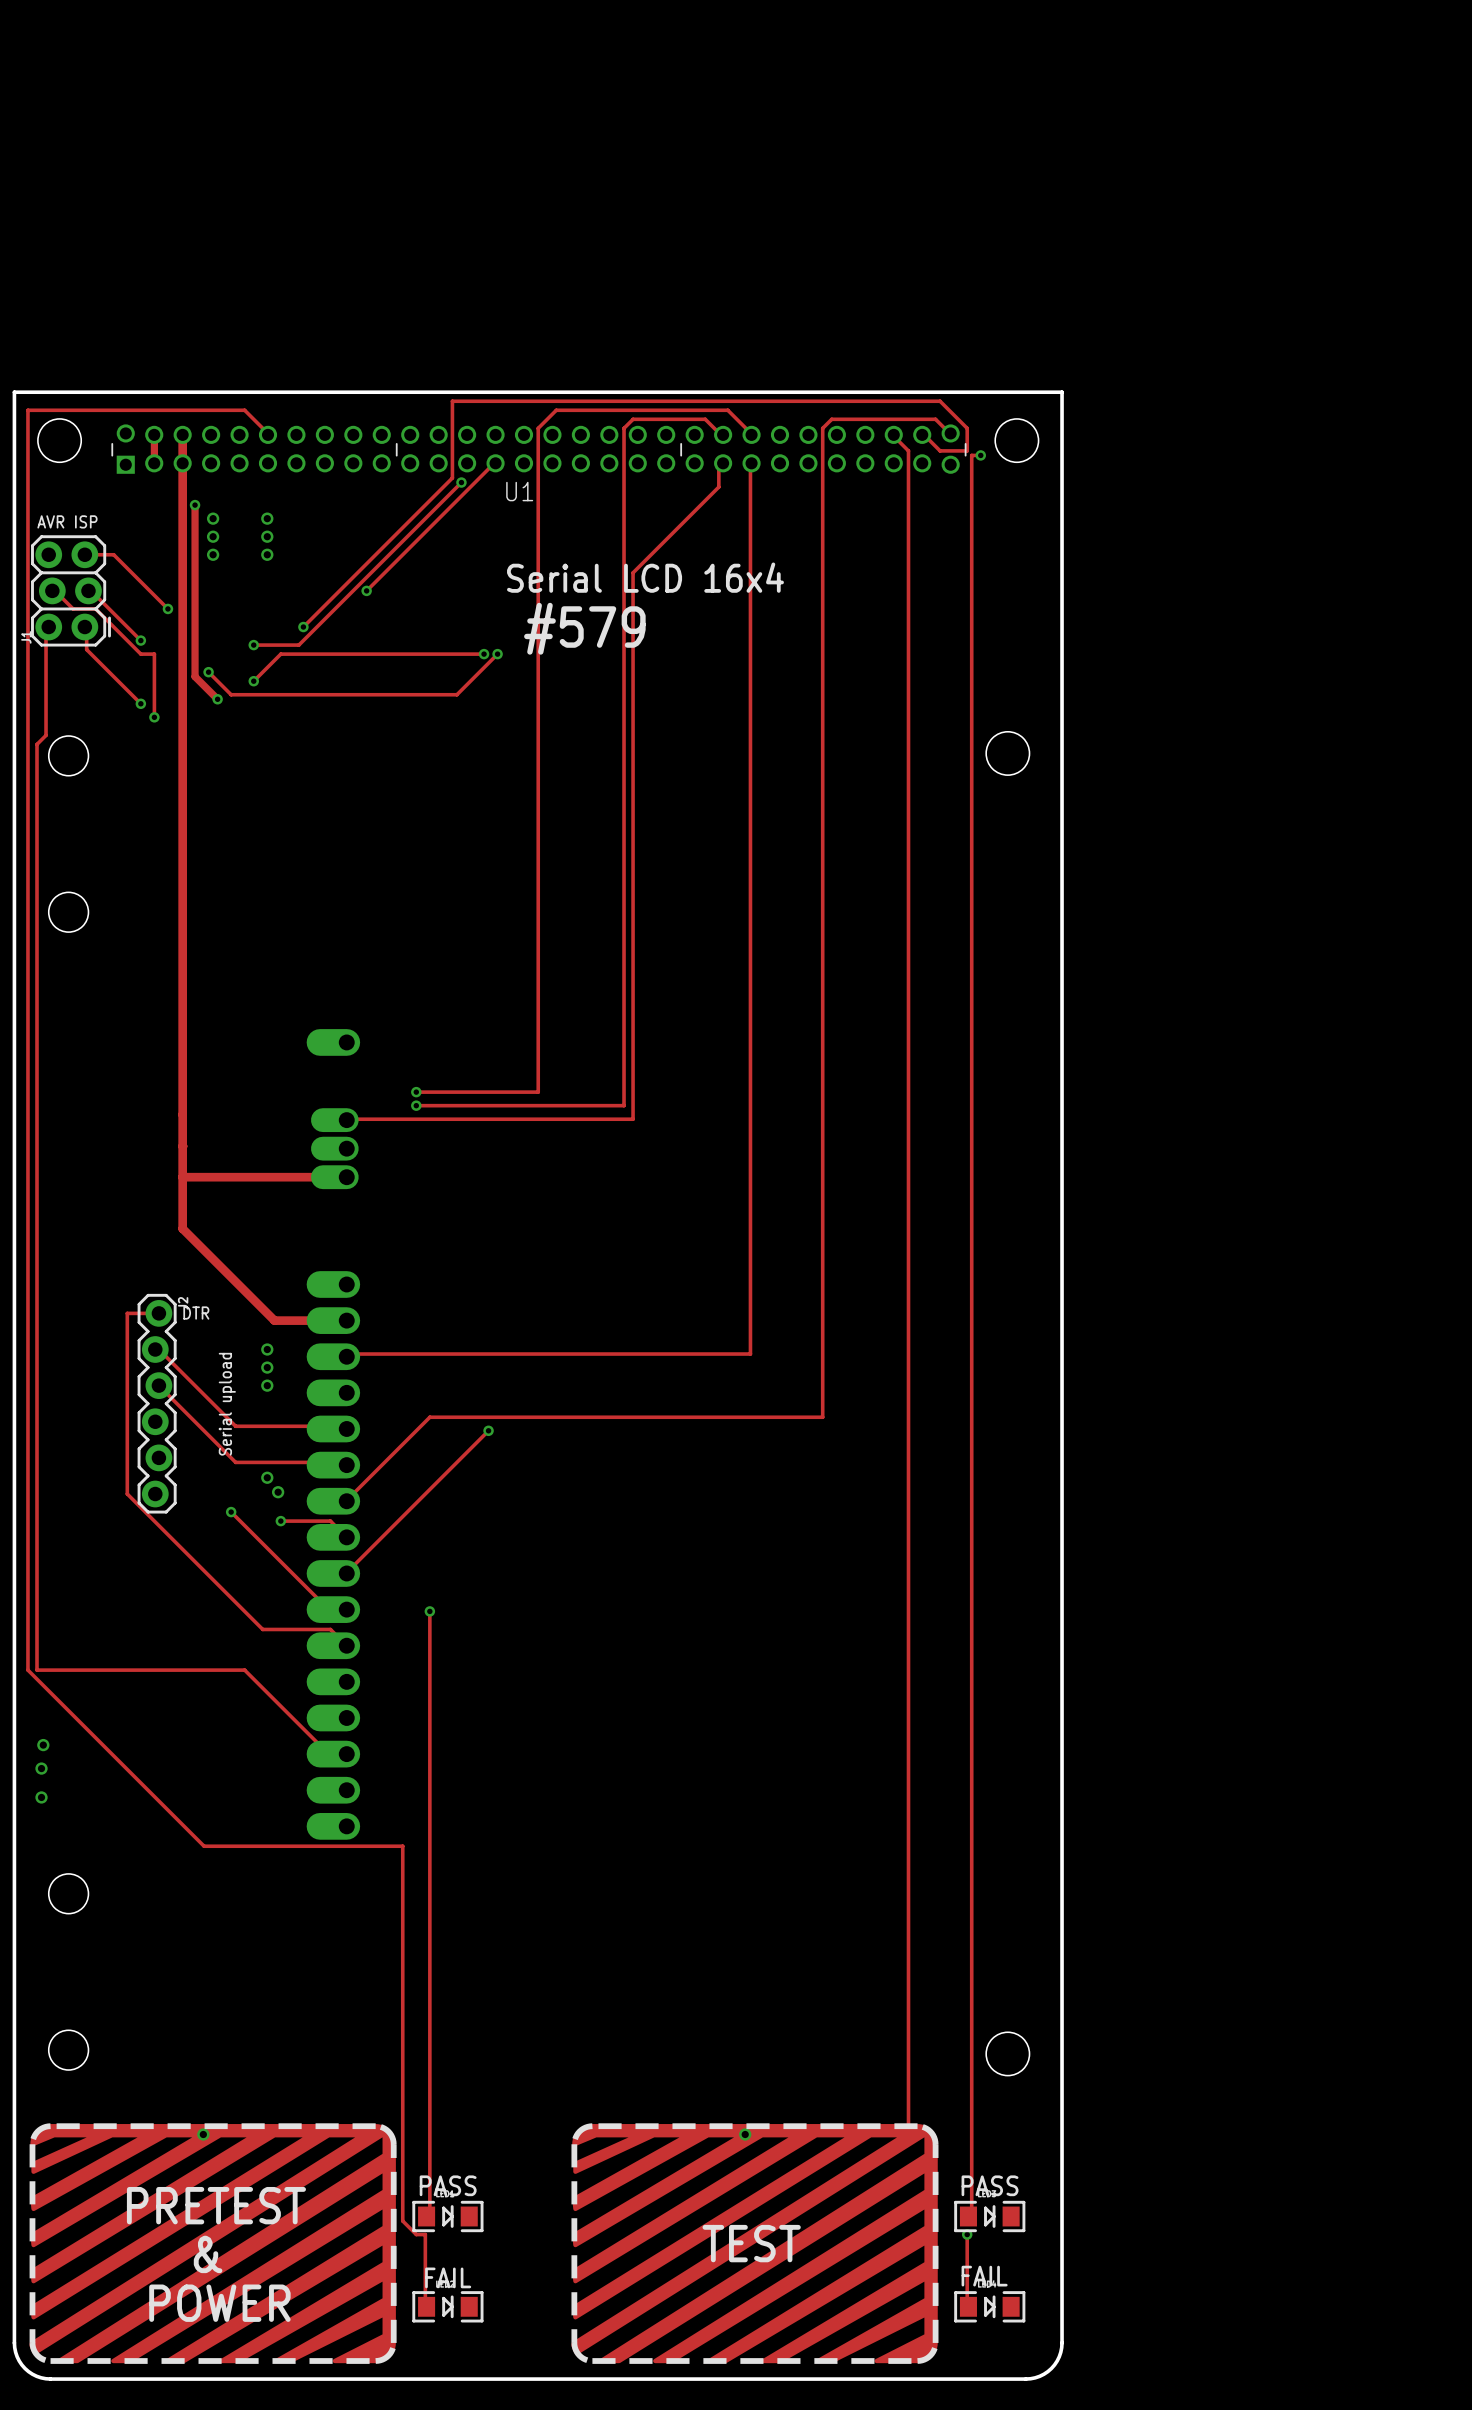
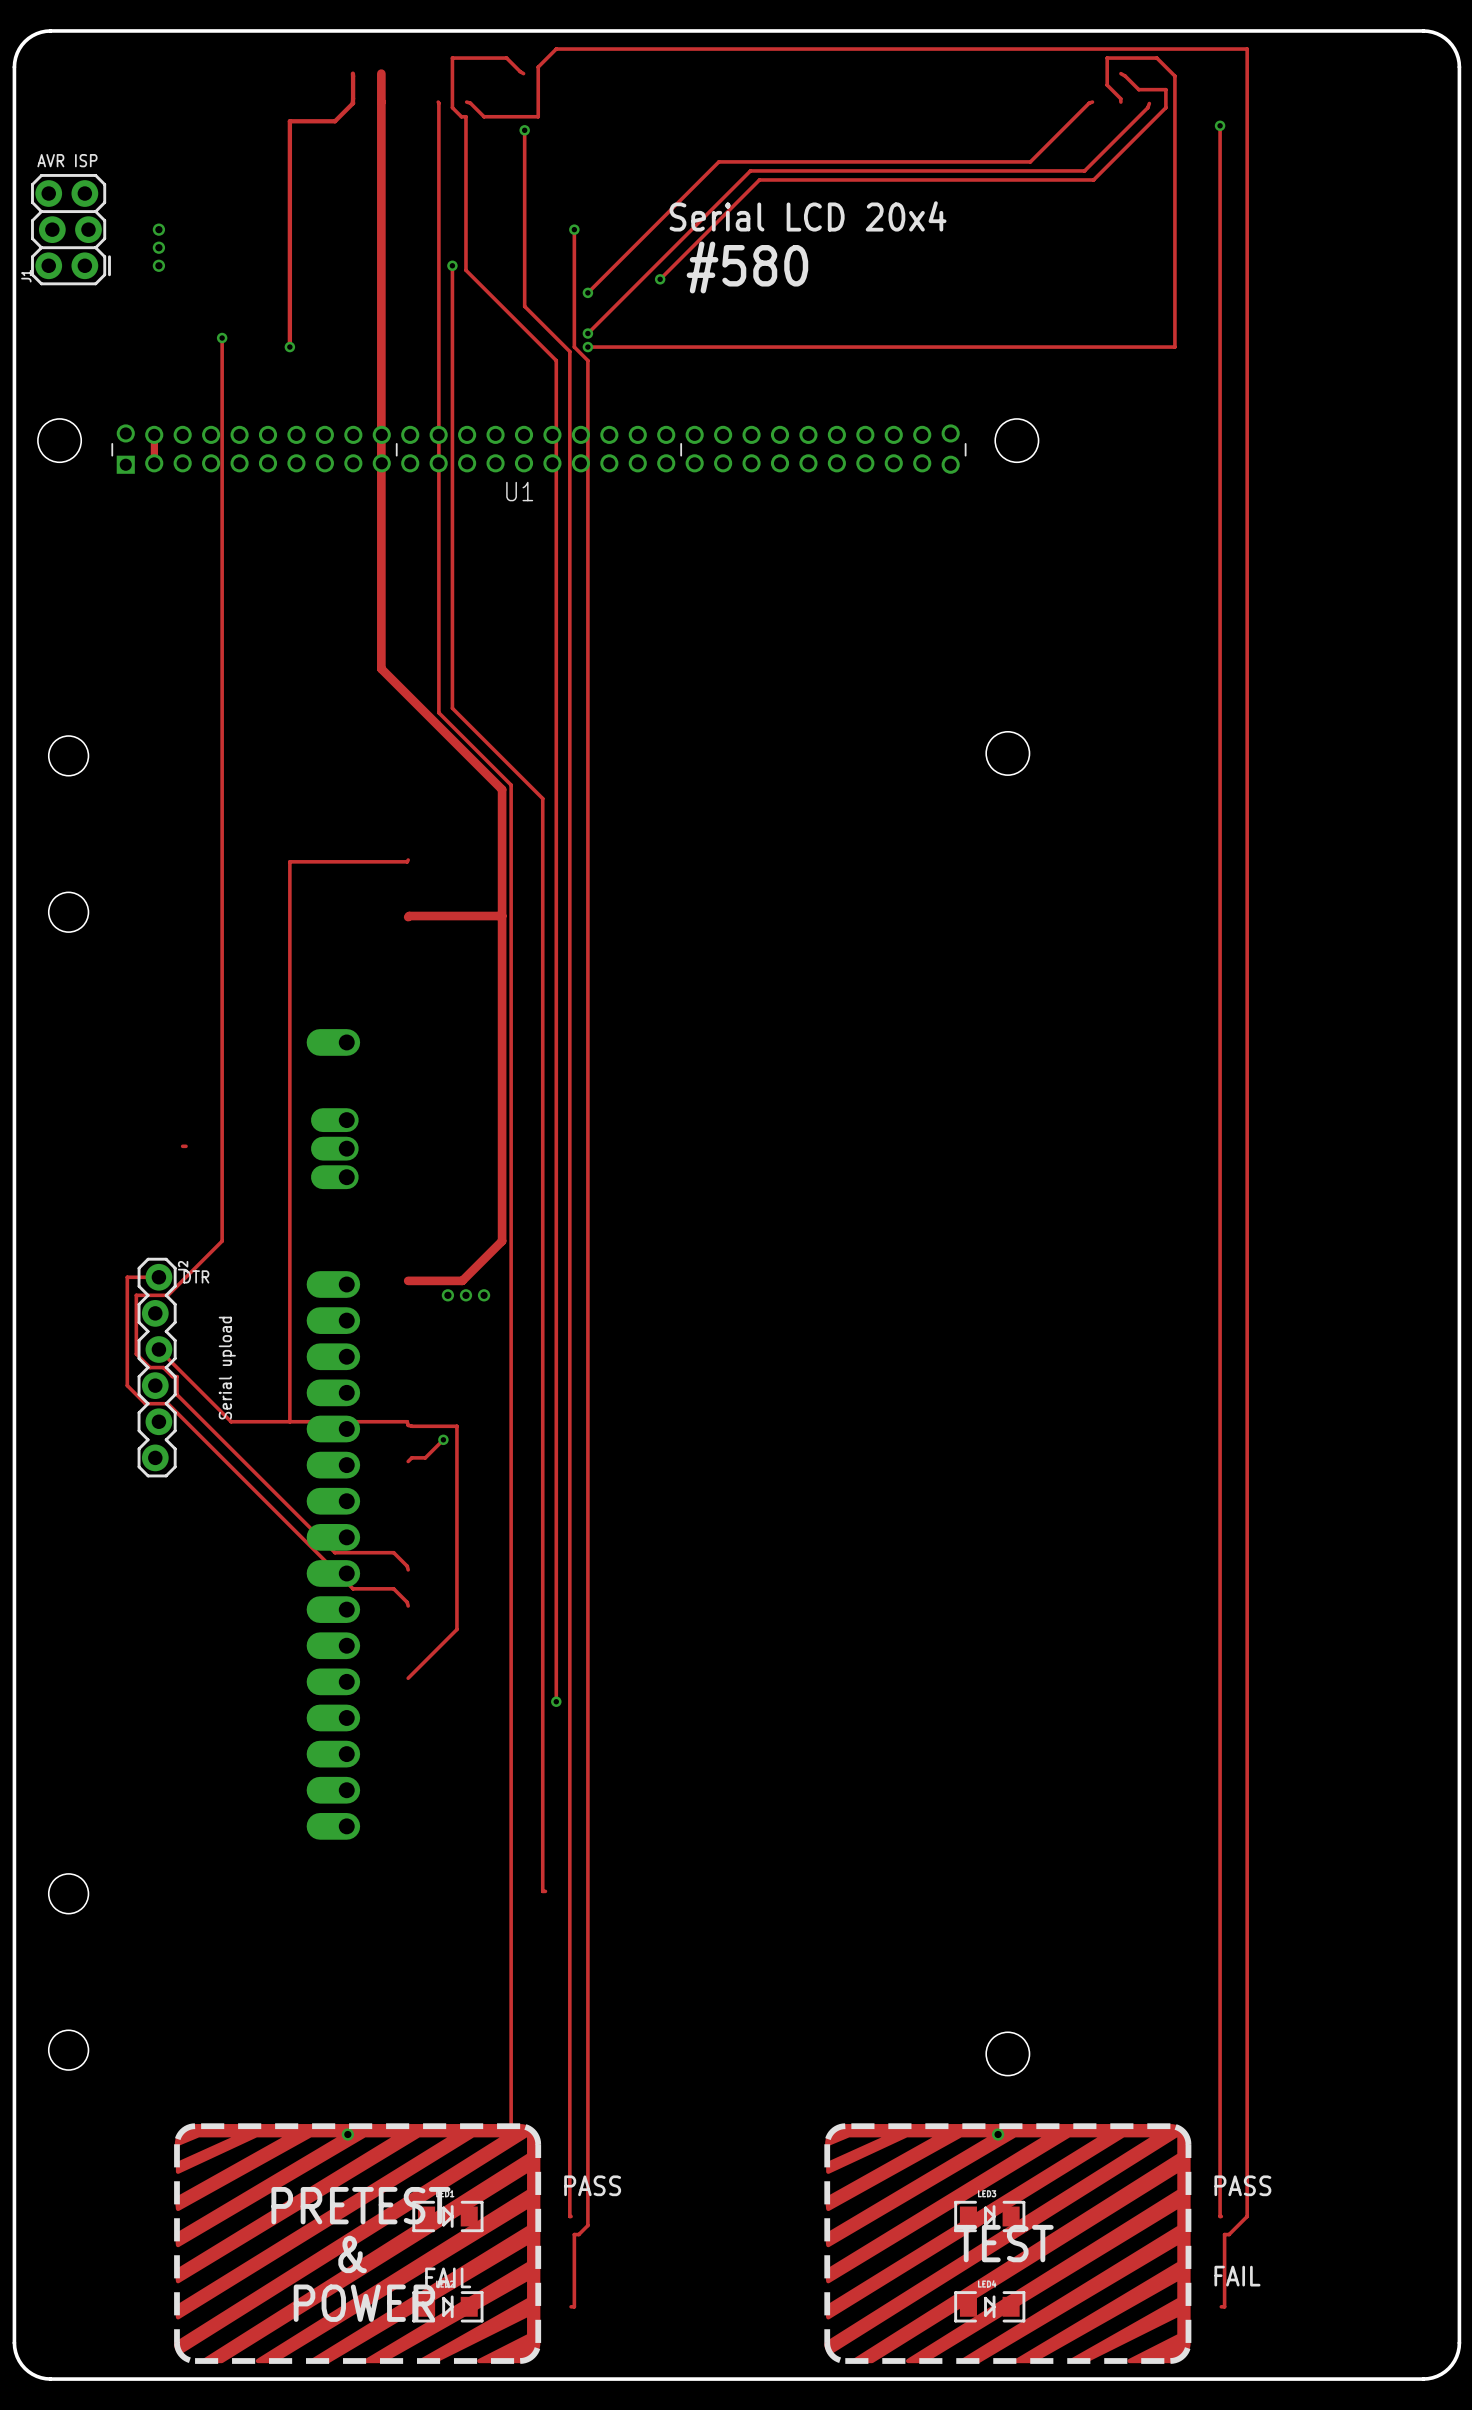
track: none -> (352, 73) (353, 103) (335, 121) (289, 121) (289, 347)
track: none -> (381, 73) (381, 668) (502, 789) (502, 1241) (462, 1280) (408, 1280)
track: none -> (523, 73) (506, 58) (452, 58) (452, 107) (461, 116) (465, 116) (465, 270) (556, 360) (556, 1701)
track: none -> (1120, 73) (1138, 89) (1165, 89) (1165, 107) (1093, 179) (759, 179) (660, 279)
track: none -> (438, 102) (438, 712) (511, 785) (511, 2130) (348, 2130) (347, 2134)
track: none -> (466, 102) (470, 103) (484, 116) (538, 116) (538, 67) (556, 49) (1247, 49) (1247, 2216) (1229, 2234) (1224, 2234) (1224, 2306) (1221, 2306)
track: none -> (1092, 102) (1089, 103) (1030, 161) (718, 161) (587, 292)
track: none -> (1120, 102) (1120, 98) (1107, 85) (1107, 58) (1156, 58) (1174, 76) (1174, 347) (587, 347)
track: none -> (1149, 103) (1147, 107) (1084, 170) (750, 170) (587, 333)
track: none -> (1220, 125) (1221, 2216)
via: none -> (1220, 125)
track: none -> (524, 130) (524, 306) (569, 351) (571, 2216)
via: none -> (524, 130)
text: none -> AVR ISP (67, 160)
text: none -> Serial LCD 20x4 (808, 216)
via: none -> (158, 229)
track: none -> (574, 229) (574, 347) (587, 360) (587, 2225) (578, 2234) (574, 2234) (574, 2306) (571, 2306)
via: none -> (574, 229)
via: none -> (158, 247)
via: none -> (158, 265)
via: none -> (452, 265)
text: none -> #580 (747, 267)
via: none -> (660, 279)
via: none -> (587, 292)
via: none -> (587, 333)
track: none -> (222, 338) (222, 1241) (167, 1295) (136, 1295) (136, 1354) (149, 1367) (163, 1367) (172, 1376) (176, 1376) (176, 1394) (335, 1552) (393, 1552) (407, 1566) (408, 1569)
via: none -> (222, 338)
via: none -> (289, 347)
via: none -> (587, 347)
board edge: (14, 392) (1062, 392) (1062, 2342) (1059, 2356) (1051, 2368) (1039, 2376) (1025, 2379) -> (14, 392) (14, 62) (17, 53) (25, 41) (41, 32) (1423, 30) (1441, 35) (1454, 49) (1459, 67) (1459, 2347) (1456, 2356) (1448, 2368) (1437, 2376) (1427, 2378) (1025, 2379)
track: (452, 401) (940, 401) (967, 428) (967, 450) (940, 450) (922, 434) -> (452, 401) (452, 265)
track: (950, 433) (935, 419) (831, 419) (822, 428) (822, 1417) (429, 1417) (346, 1501) -> none
track: (182, 434) (182, 1228) (274, 1320) (346, 1320) -> none
track: (268, 434) (244, 410) (27, 410) (27, 1670) (204, 1846) (402, 1846) (402, 2221) (416, 2234) (425, 2234) (426, 2306) -> none
track: (723, 434) (705, 419) (633, 419) (624, 428) (624, 1105) (416, 1105) -> none
track: (751, 434) (727, 410) (556, 410) (538, 428) (538, 1092) (416, 1092) -> none
track: (893, 434) (908, 450) (908, 2130) (745, 2130) (745, 2134) -> none
track: (980, 455) (971, 455) (971, 2216) (968, 2216) -> none
via: (980, 455) -> none
track: (495, 463) (366, 590) -> none
track: (723, 463) (718, 464) (718, 487) (633, 572) (633, 1119) (346, 1120) -> none
track: (751, 463) (750, 1354) (348, 1354) (346, 1356) -> none
track: (452, 478) (303, 627) -> (452, 478) (452, 708) (542, 798) (542, 1891) (545, 1891)
track: (461, 482) (298, 645) (253, 645) -> none
via: (461, 482) -> none
track: (195, 505) (195, 676) (217, 699) -> none
via: (195, 505) -> none
via: (213, 518) -> none
via: (267, 518) -> none
text: AVR ISP (67, 521) -> none
via: (213, 536) -> none
via: (267, 536) -> none
track: (84, 554) (113, 554) (167, 608) -> none
via: (213, 554) -> none
via: (267, 554) -> none
text: Serial LCD 16x4 (645, 577) -> none
track: (52, 590) (55, 590) (73, 608) (95, 608) (140, 654) (154, 654) (154, 717) -> none
J1 position: (70, 590) -> (70, 229)
track: (88, 590) (91, 590) (140, 640) -> none
via: (366, 590) -> none
via: (167, 608) -> none
track: (48, 627) (46, 627) (46, 735) (36, 744) (36, 1670) (244, 1670) (325, 1751) (344, 1751) (346, 1754) -> none
track: (84, 627) (86, 627) (86, 649) (140, 703) -> none
via: (303, 627) -> none
text: #579 (584, 628) -> none
via: (140, 640) -> none
via: (253, 645) -> none
track: (484, 654) (280, 654) (253, 681) -> none
via: (484, 654) -> none
track: (497, 654) (456, 694) (231, 694) (208, 672) -> none
via: (497, 654) -> none
via: (208, 672) -> none
via: (253, 681) -> none
via: (217, 699) -> none
via: (140, 703) -> none
via: (154, 717) -> none
track: none -> (408, 860) (407, 861) (289, 861) (289, 1421)
track: none -> (502, 916) (408, 917)
via: (416, 1092) -> none
via: (416, 1105) -> none
track: (182, 1177) (346, 1177) -> none
via: none -> (447, 1295)
via: none -> (465, 1295)
via: none -> (484, 1295)
track: (127, 1313) (158, 1313) -> (127, 1313) (127, 1277) (158, 1277)
text position: DTR (196, 1313) -> DTR (196, 1276)
via: (267, 1349) -> none
via: (267, 1367) -> none
track: (127, 1385) (127, 1494) (262, 1629) (330, 1629) (346, 1645) -> (127, 1385) (145, 1403) (167, 1403) (353, 1588) (393, 1588) (407, 1602) (408, 1605)
track: (158, 1385) (235, 1462) (344, 1462) (346, 1465) -> none
via: (267, 1385) -> none
J2 position: (157, 1403) -> (157, 1367)
text position: Serial upload (227, 1404) -> Serial upload (227, 1368)
track: (231, 1421) (235, 1426) (344, 1426) (346, 1428) -> (231, 1421) (407, 1421) (408, 1425) (411, 1426) (456, 1426) (456, 1629) (408, 1678)
track: (488, 1430) (346, 1573) -> none
via position: (488, 1430) -> (443, 1439)
track: none -> (443, 1439) (425, 1457) (411, 1457) (408, 1461)
via: (267, 1477) -> none
via: (278, 1492) -> none
track: (231, 1512) (325, 1606) (344, 1606) (346, 1609) -> none
via: (231, 1512) -> none
track: (280, 1521) (330, 1521) (346, 1537) -> none
via: (280, 1521) -> none
track: (429, 1611) (429, 2216) (426, 2216) -> none
via: (429, 1611) -> none
via: none -> (556, 1701)
via: (43, 1745) -> none
via: (41, 1768) -> none
via: (41, 1797) -> none
text position: PASS (448, 2185) -> PASS (592, 2185)
text: PASS (990, 2185) -> none
text: none -> PASS (1242, 2185)
text position: PRETEST (216, 2205) -> PRETEST (360, 2205)
track: (967, 2234) (968, 2306) -> none
via: (967, 2234) -> none
part position: (213, 2243) -> (357, 2243)
text position: TEST (751, 2243) -> TEST (1004, 2243)
part: (754, 2243) -> none
part: none -> (1007, 2243)
text position: & (208, 2254) -> & (352, 2254)
text position: FAIL (984, 2276) -> FAIL (1237, 2276)
text position: POWER (219, 2303) -> POWER (364, 2303)

